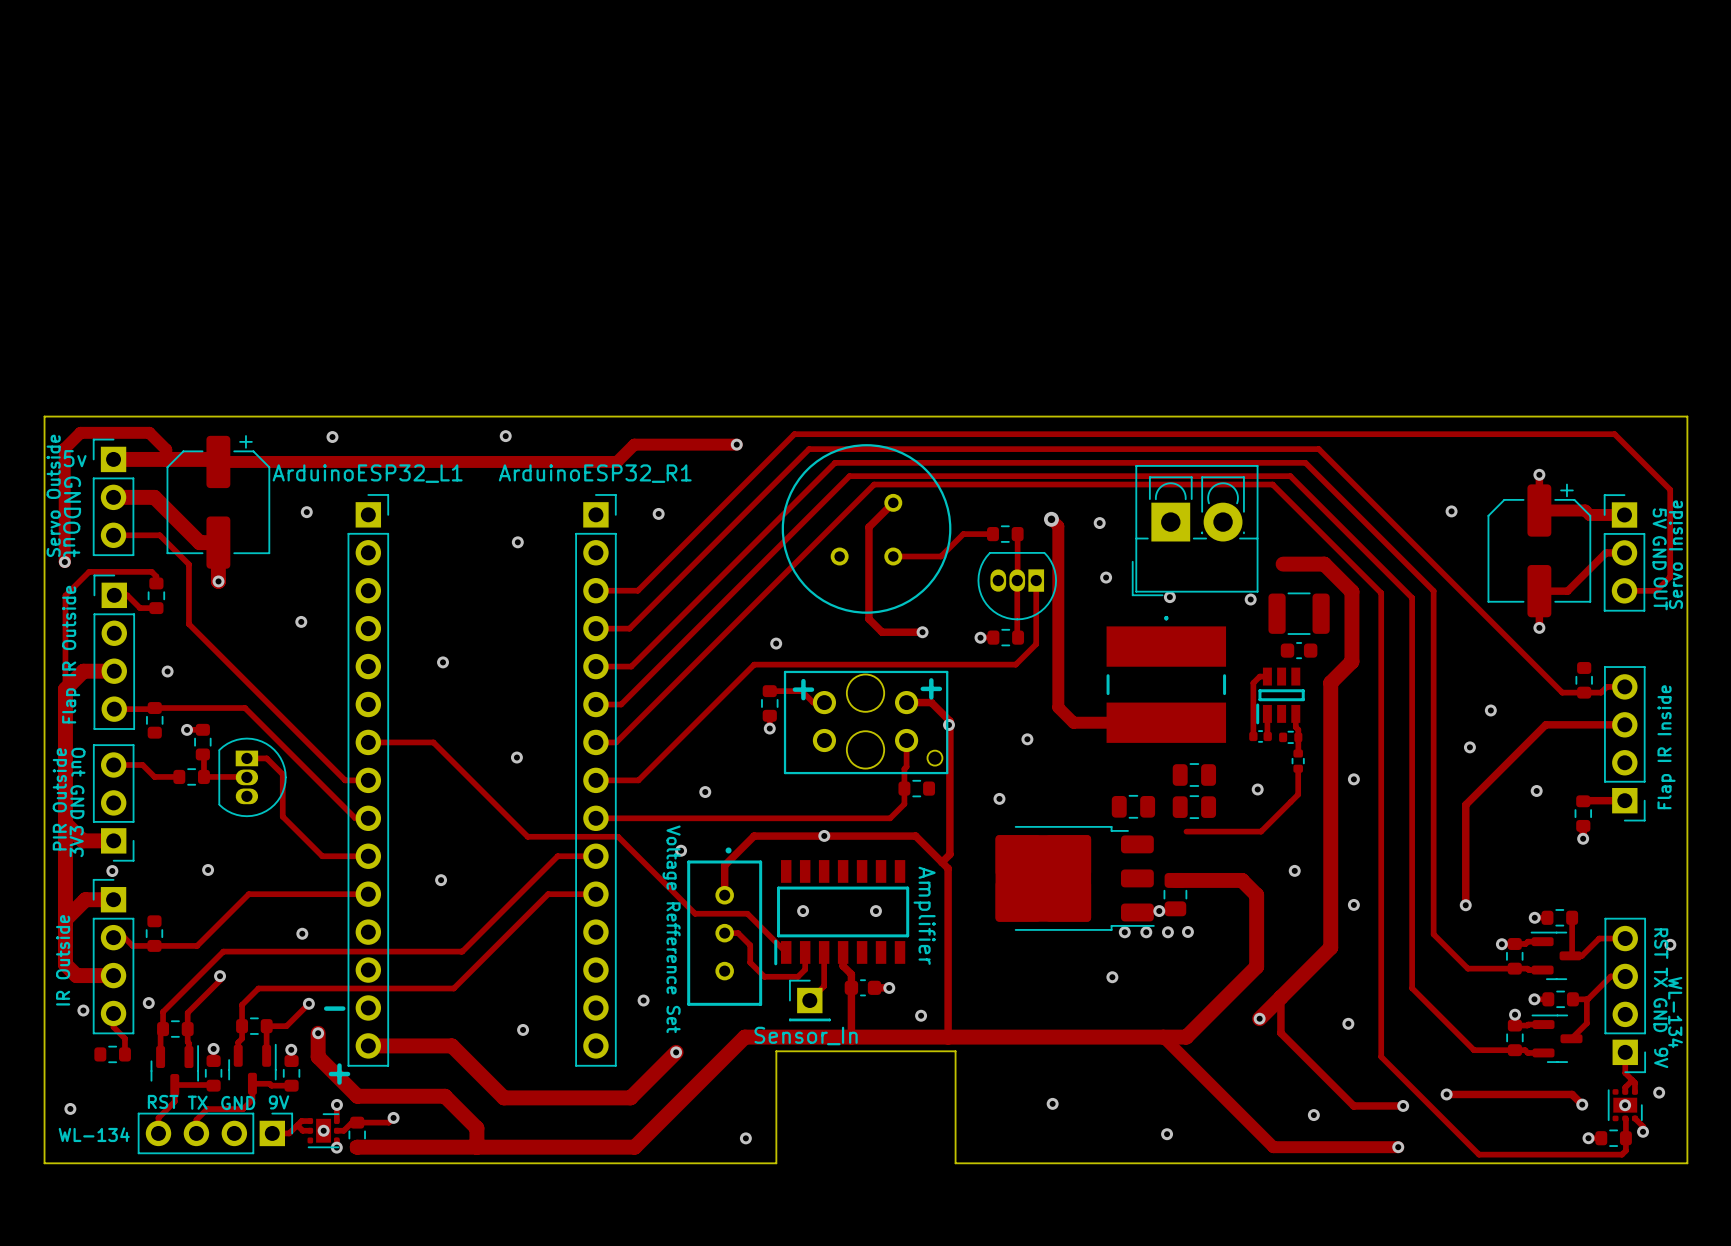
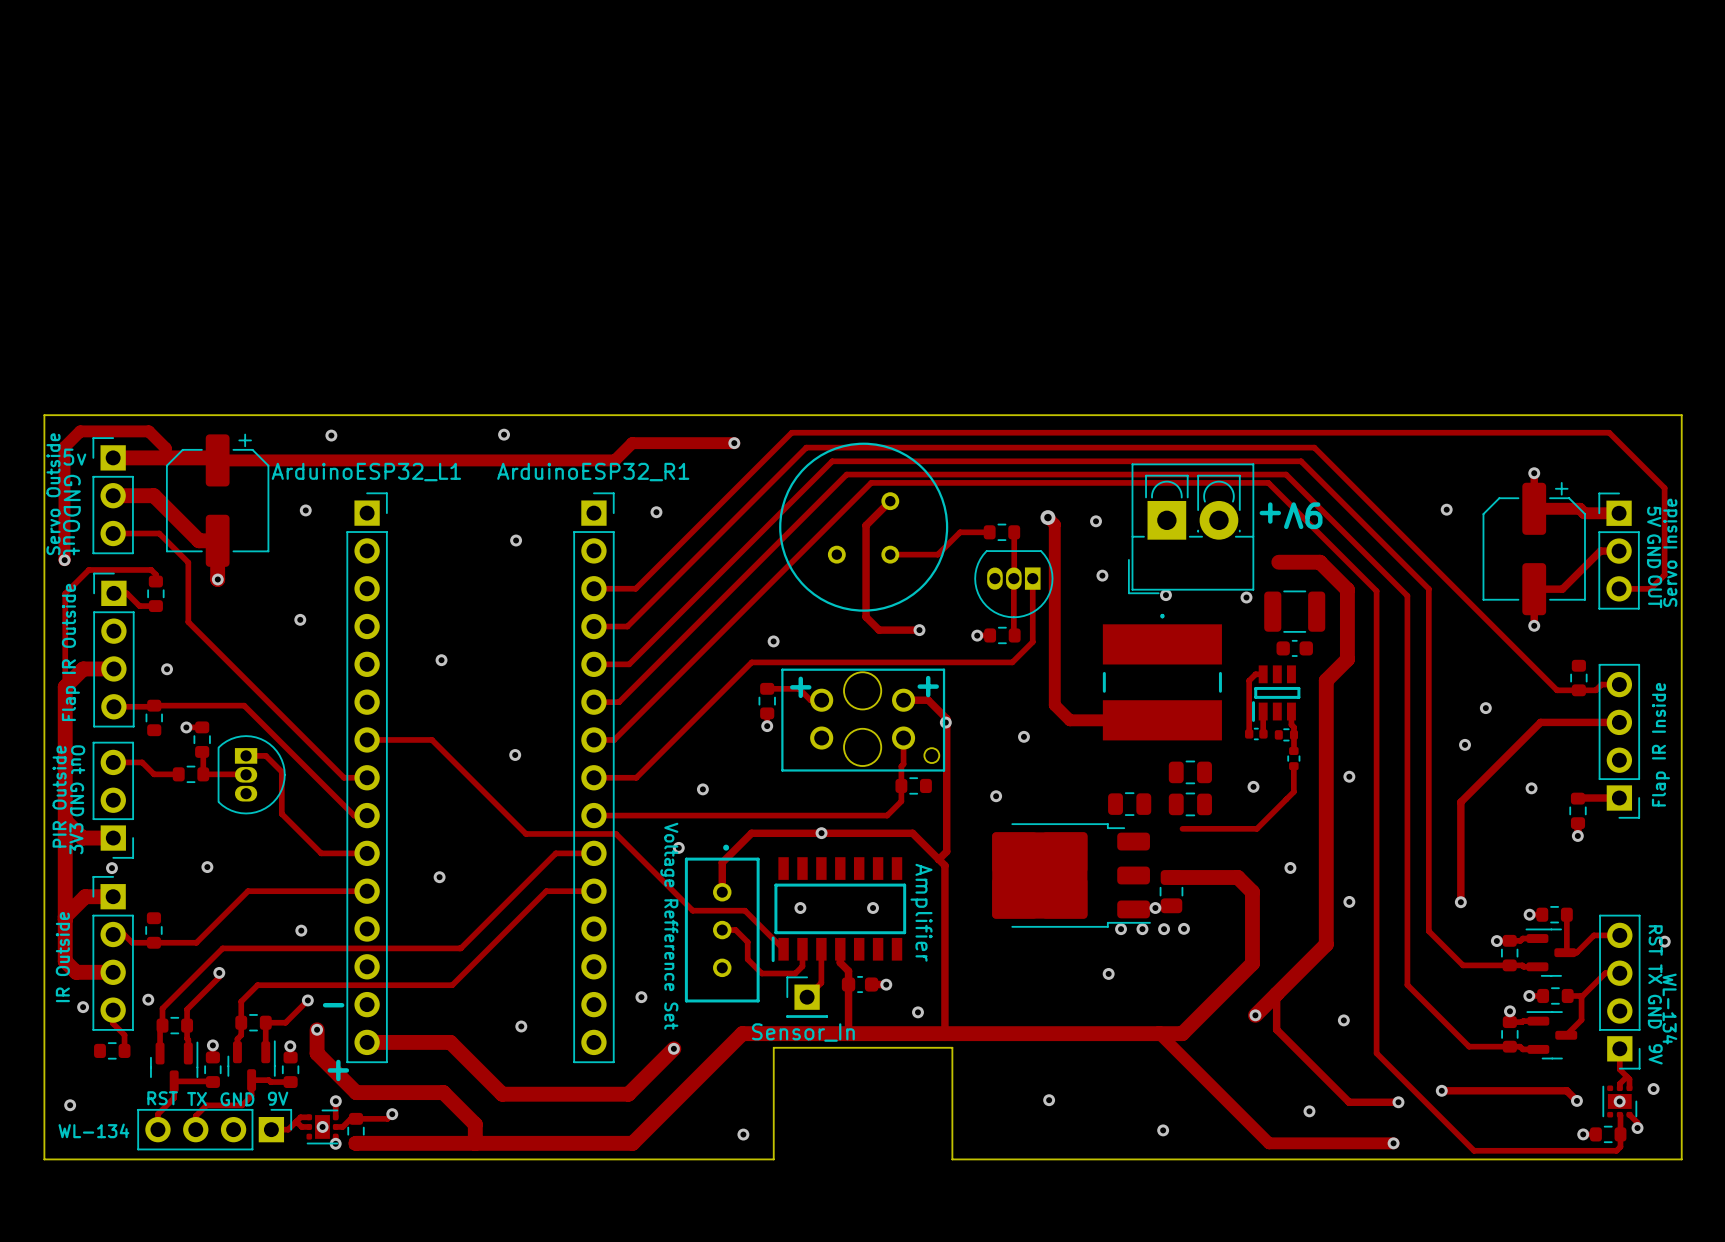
text: none -> 9V+ (1291, 515)

